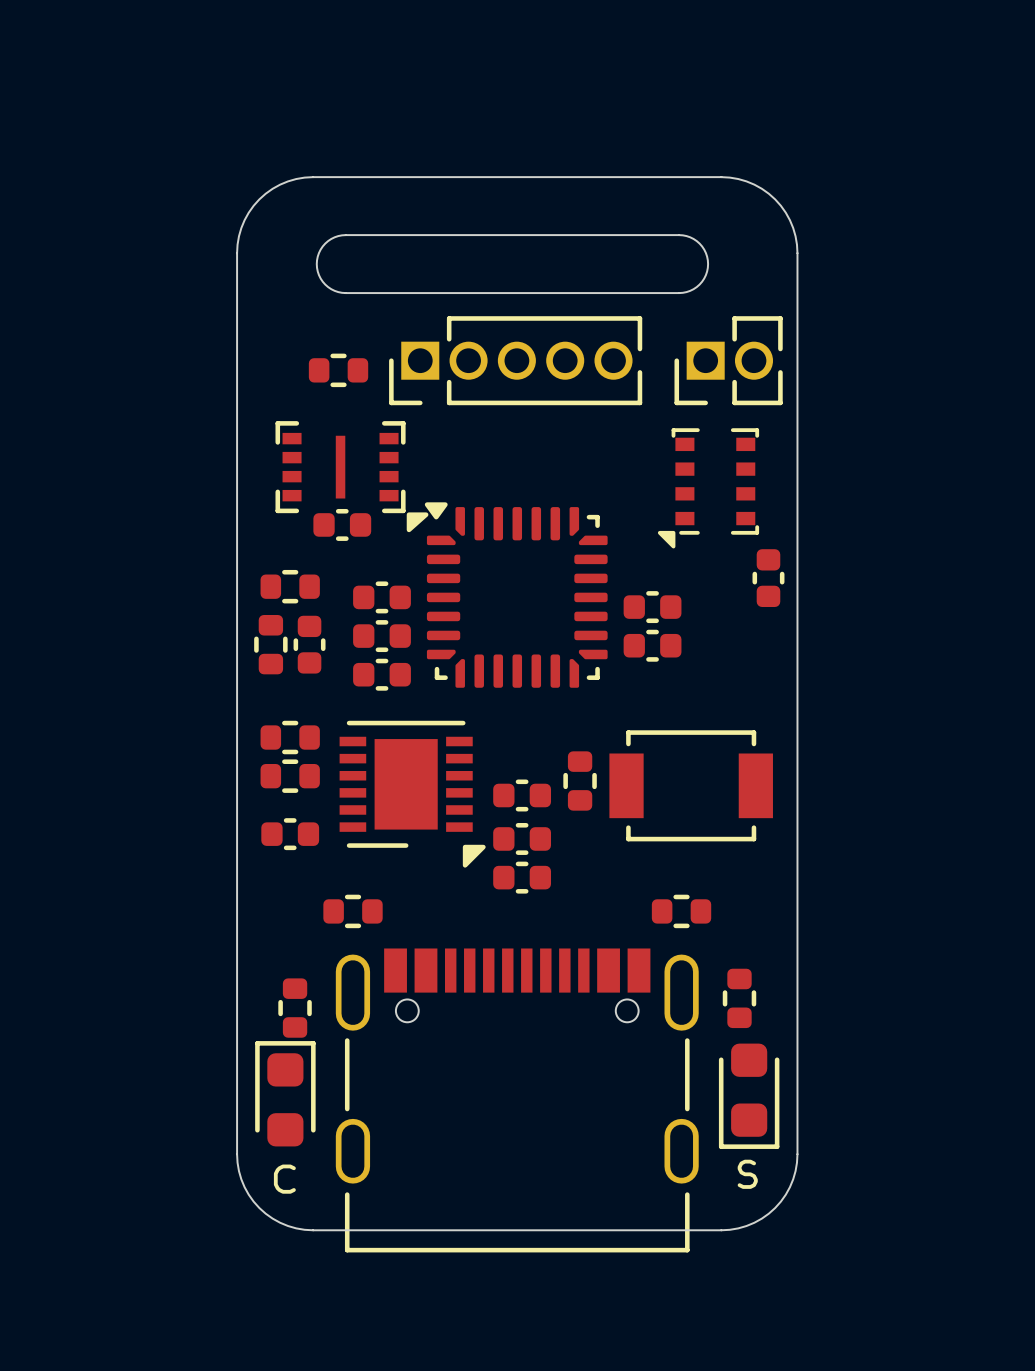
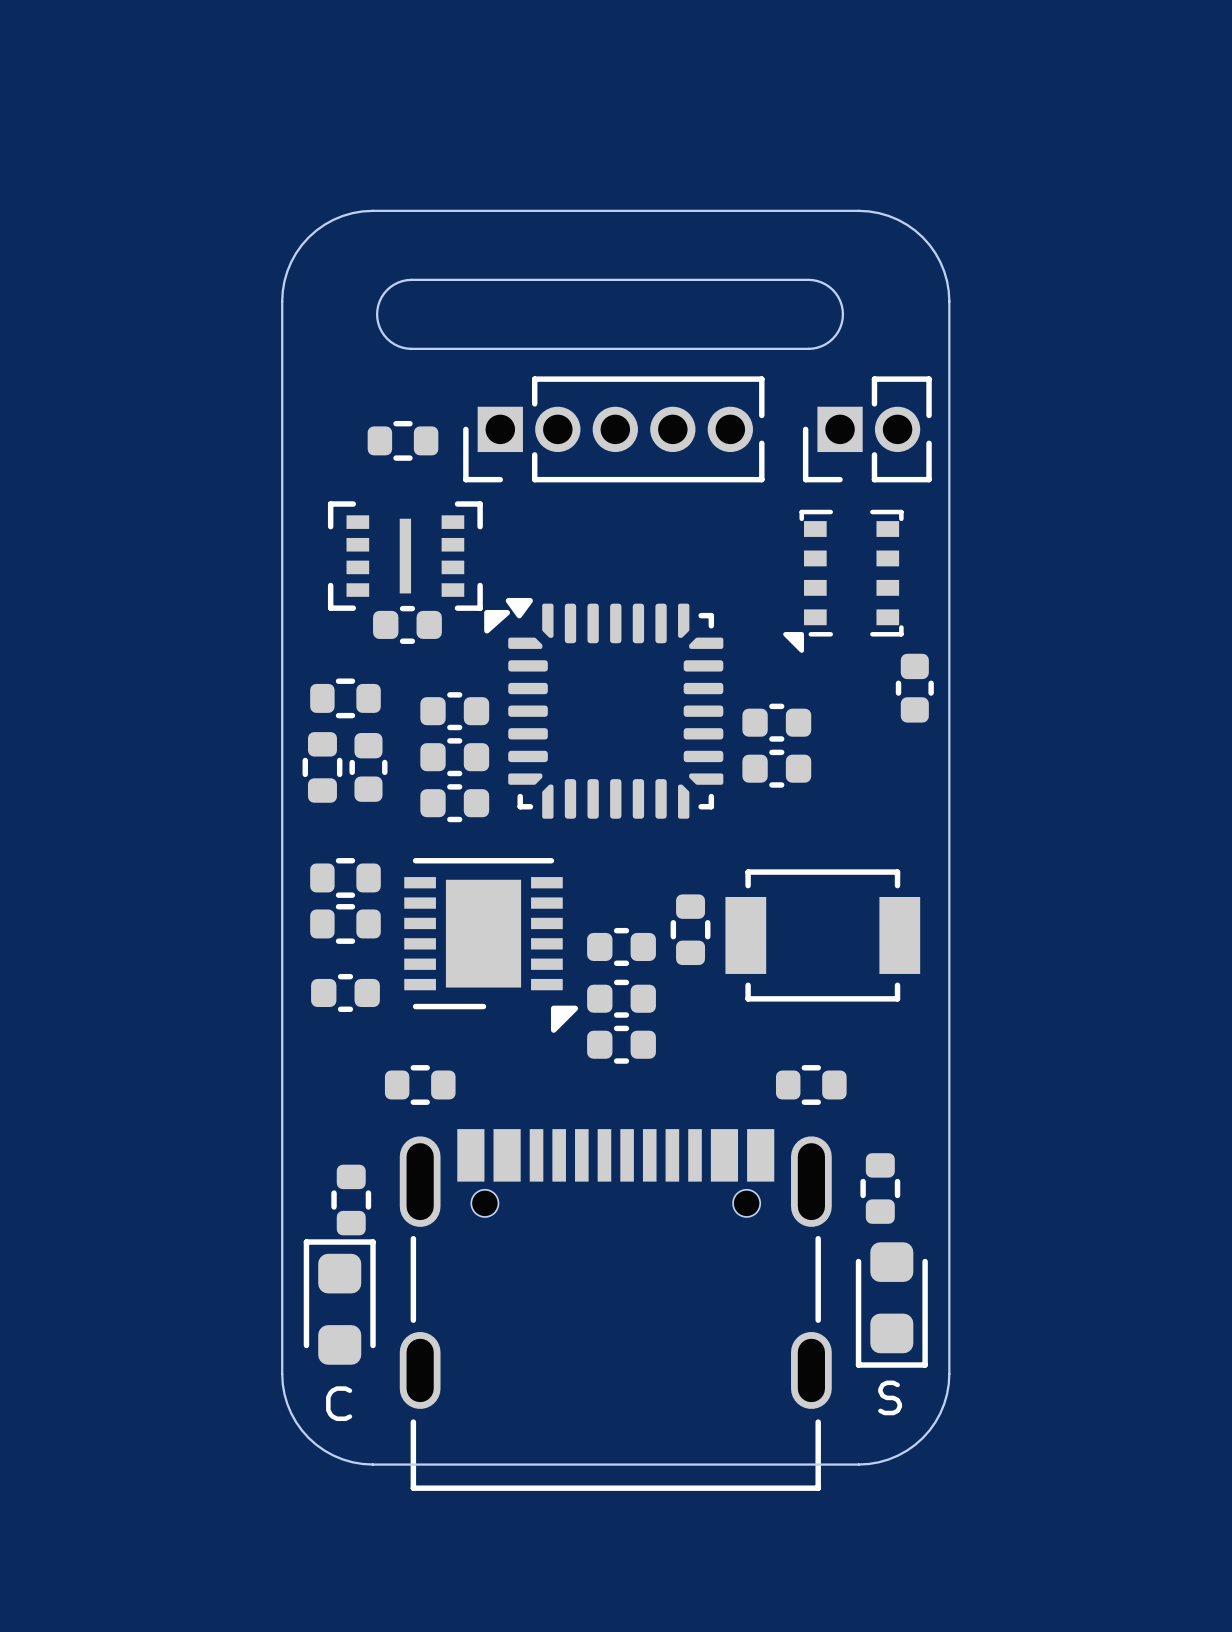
part footprint: [275, 421, 429, 533] -> [327, 501, 510, 634]

